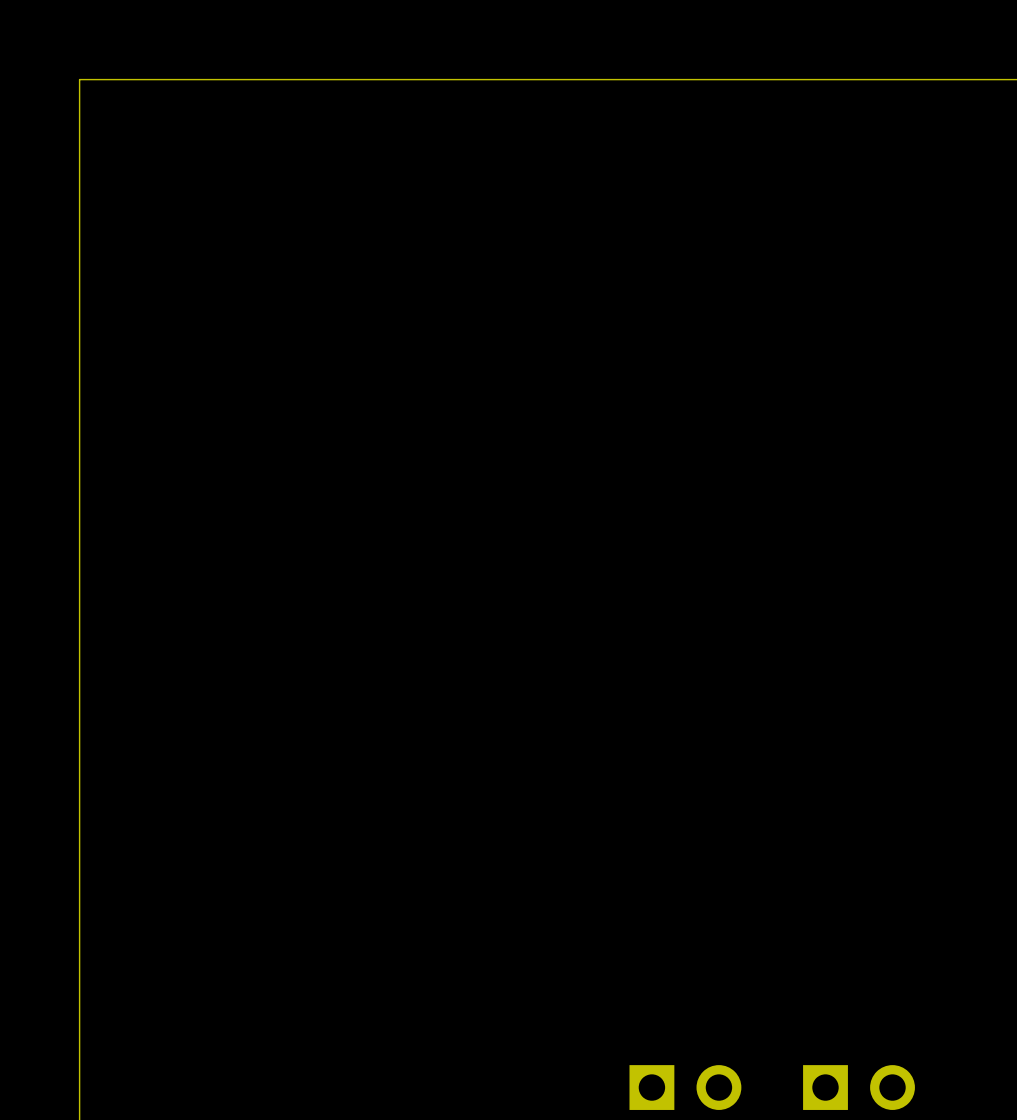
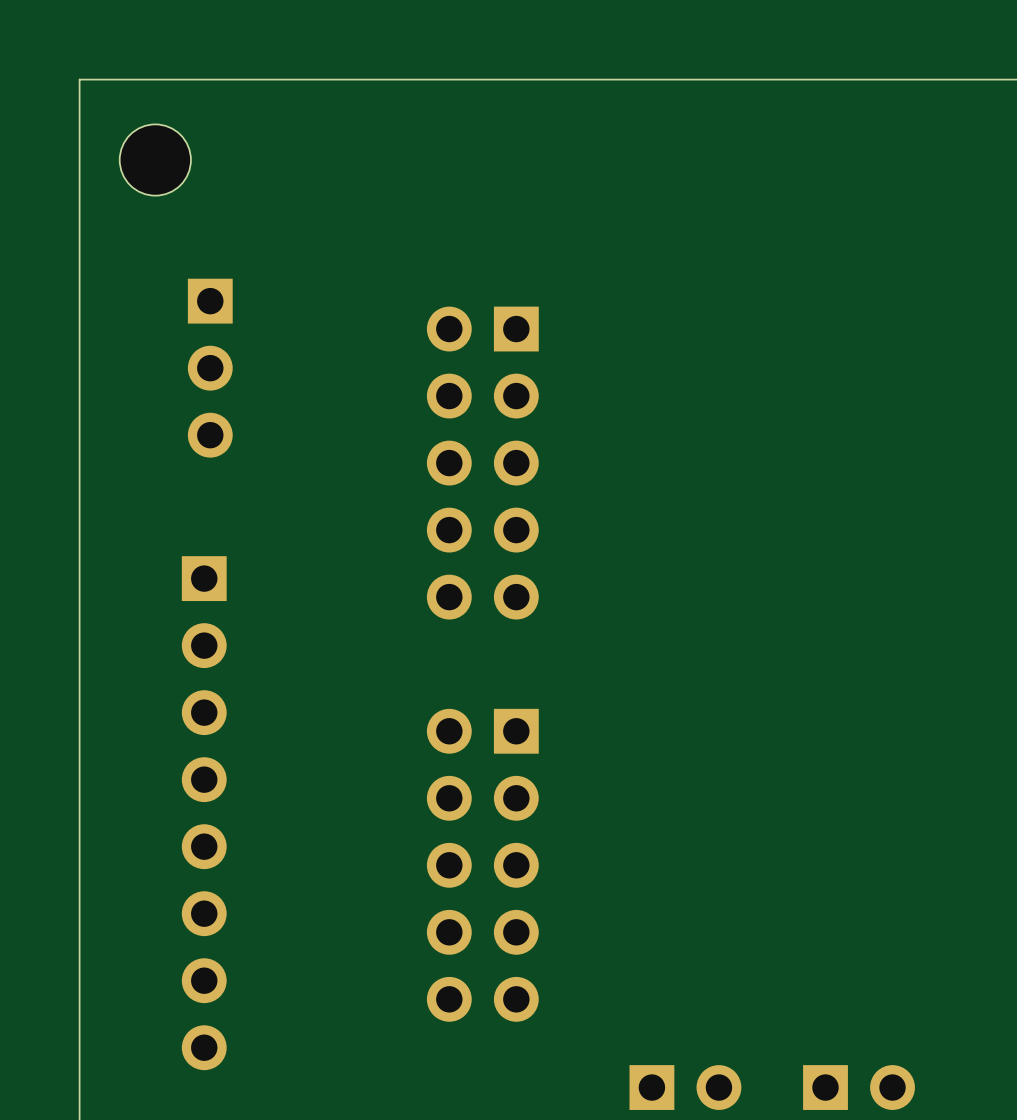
part: none -> (155, 160)
part: none -> (210, 368)
part: none -> (482, 463)
part: none -> (204, 813)
part: none -> (482, 865)

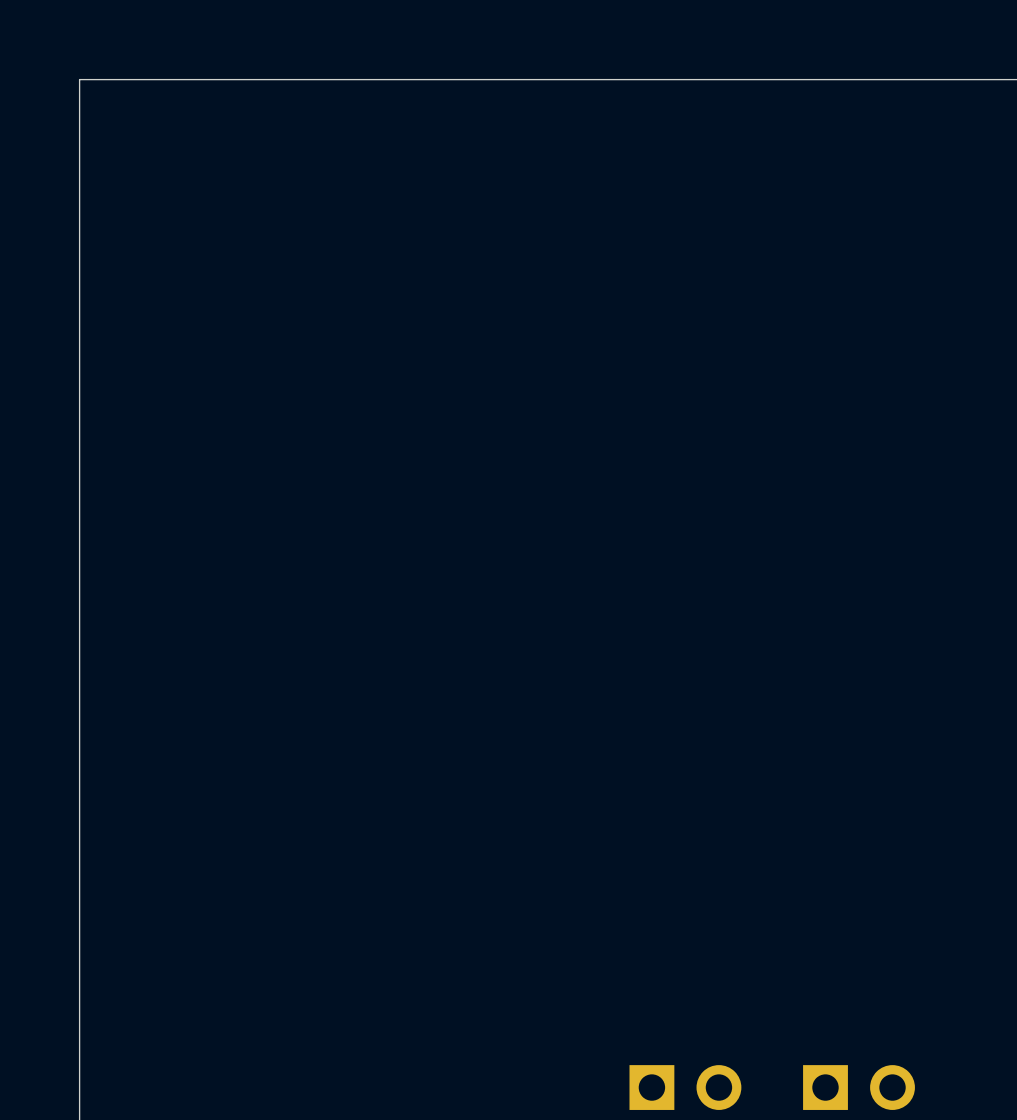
part: (155, 160) -> none
part: (210, 368) -> none
part: (482, 463) -> none
part: (204, 813) -> none
part: (482, 865) -> none

